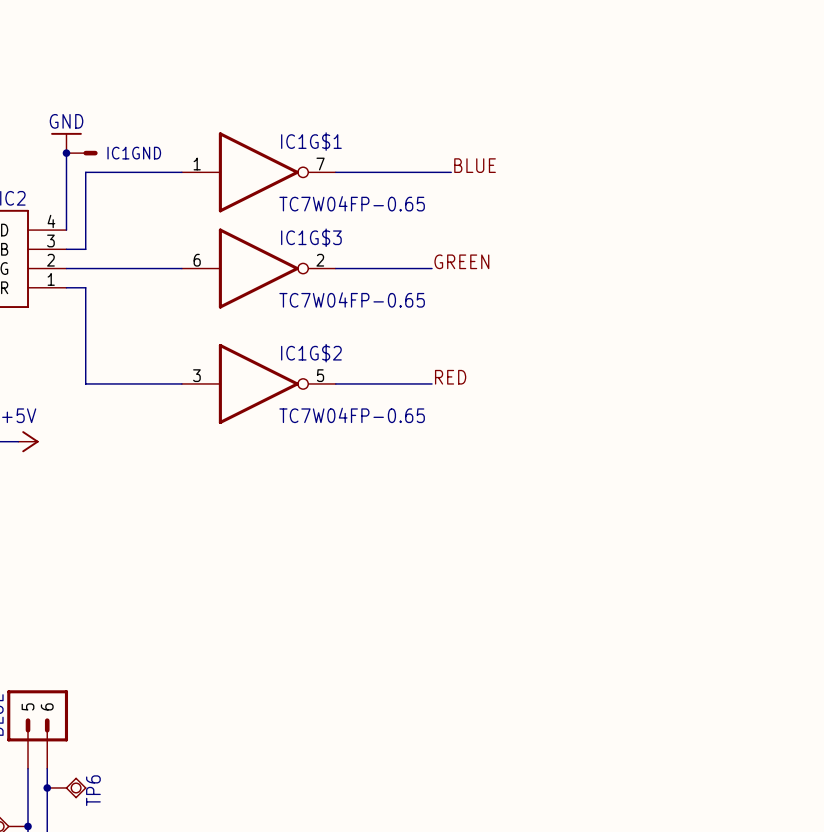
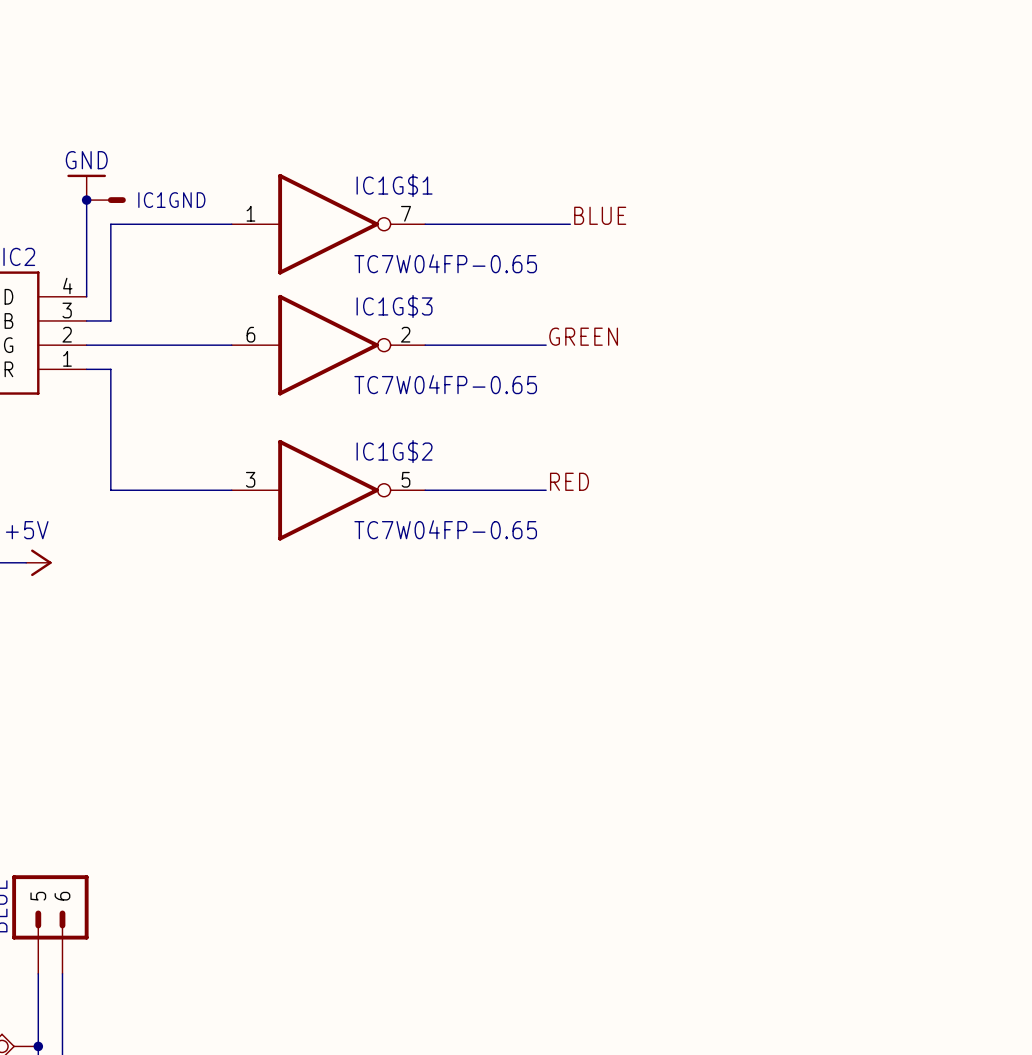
junction: (47, 787) -> none
TP6: (66, 787) -> none

